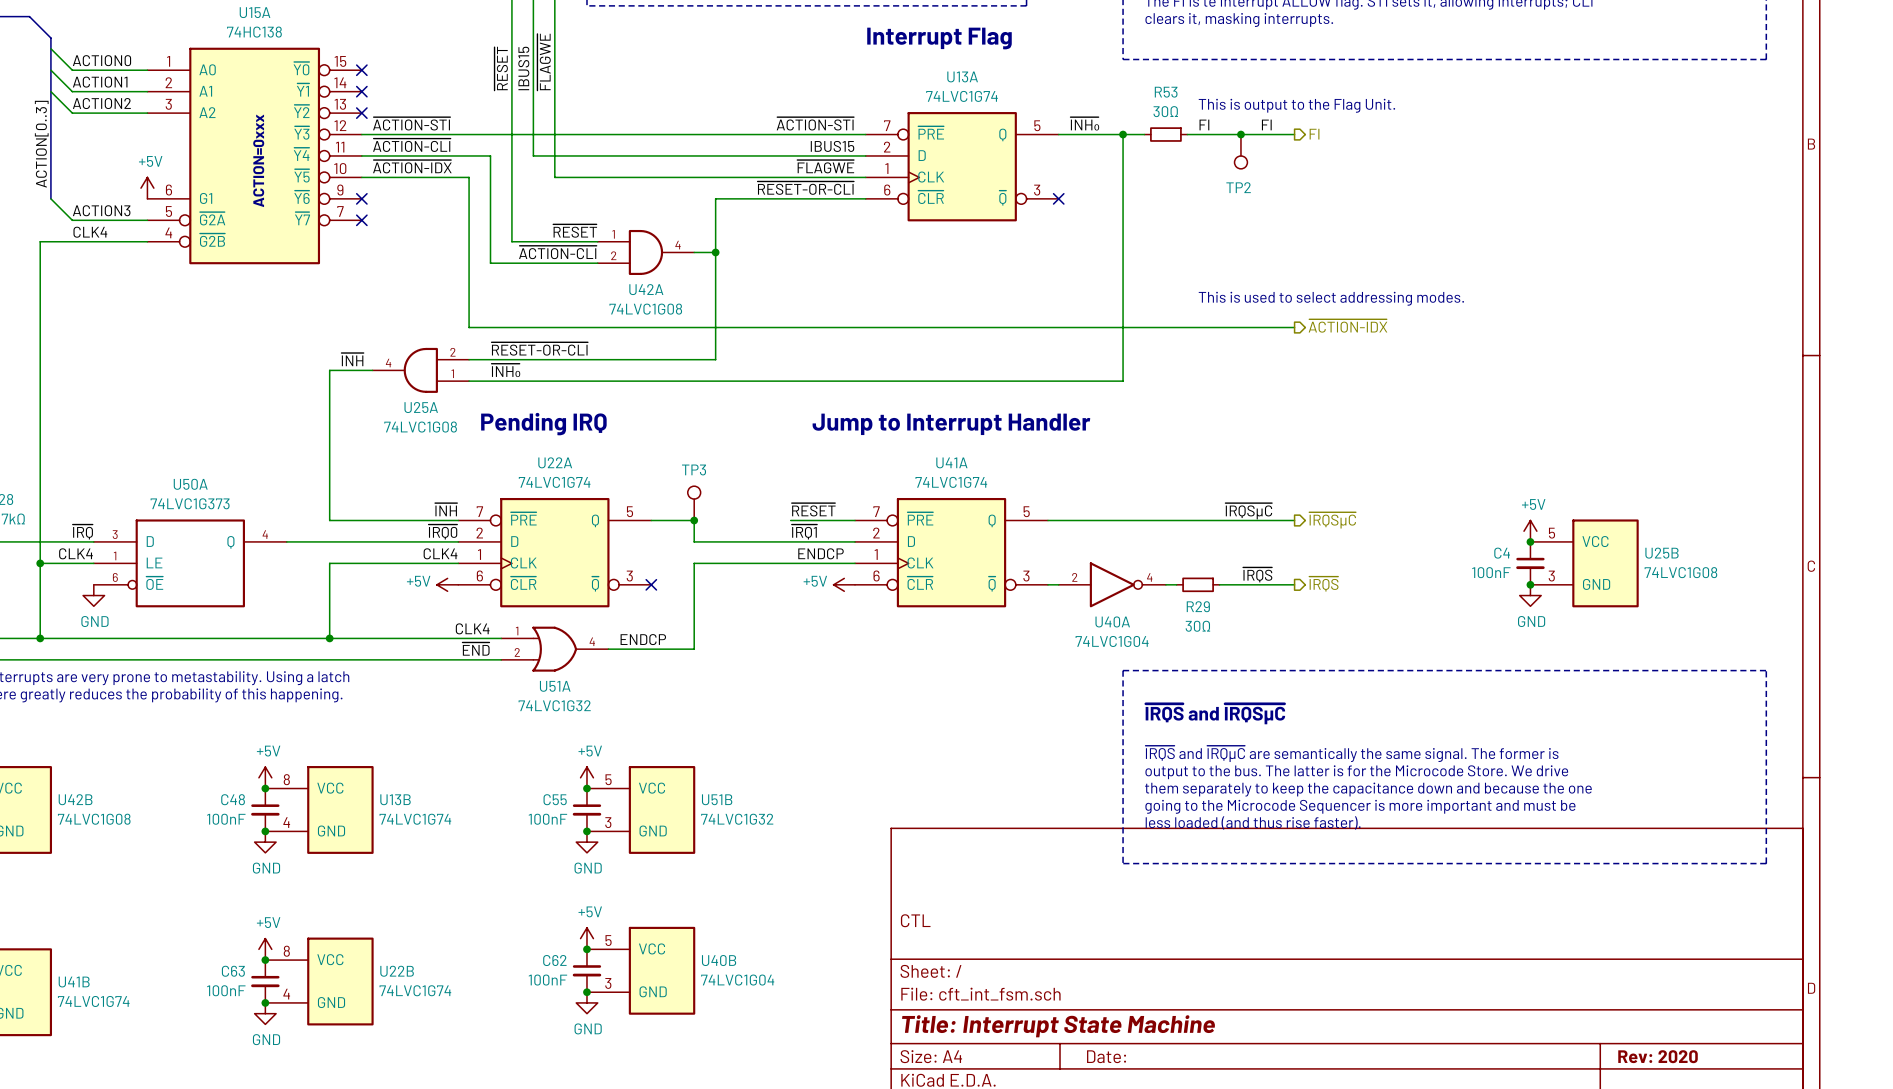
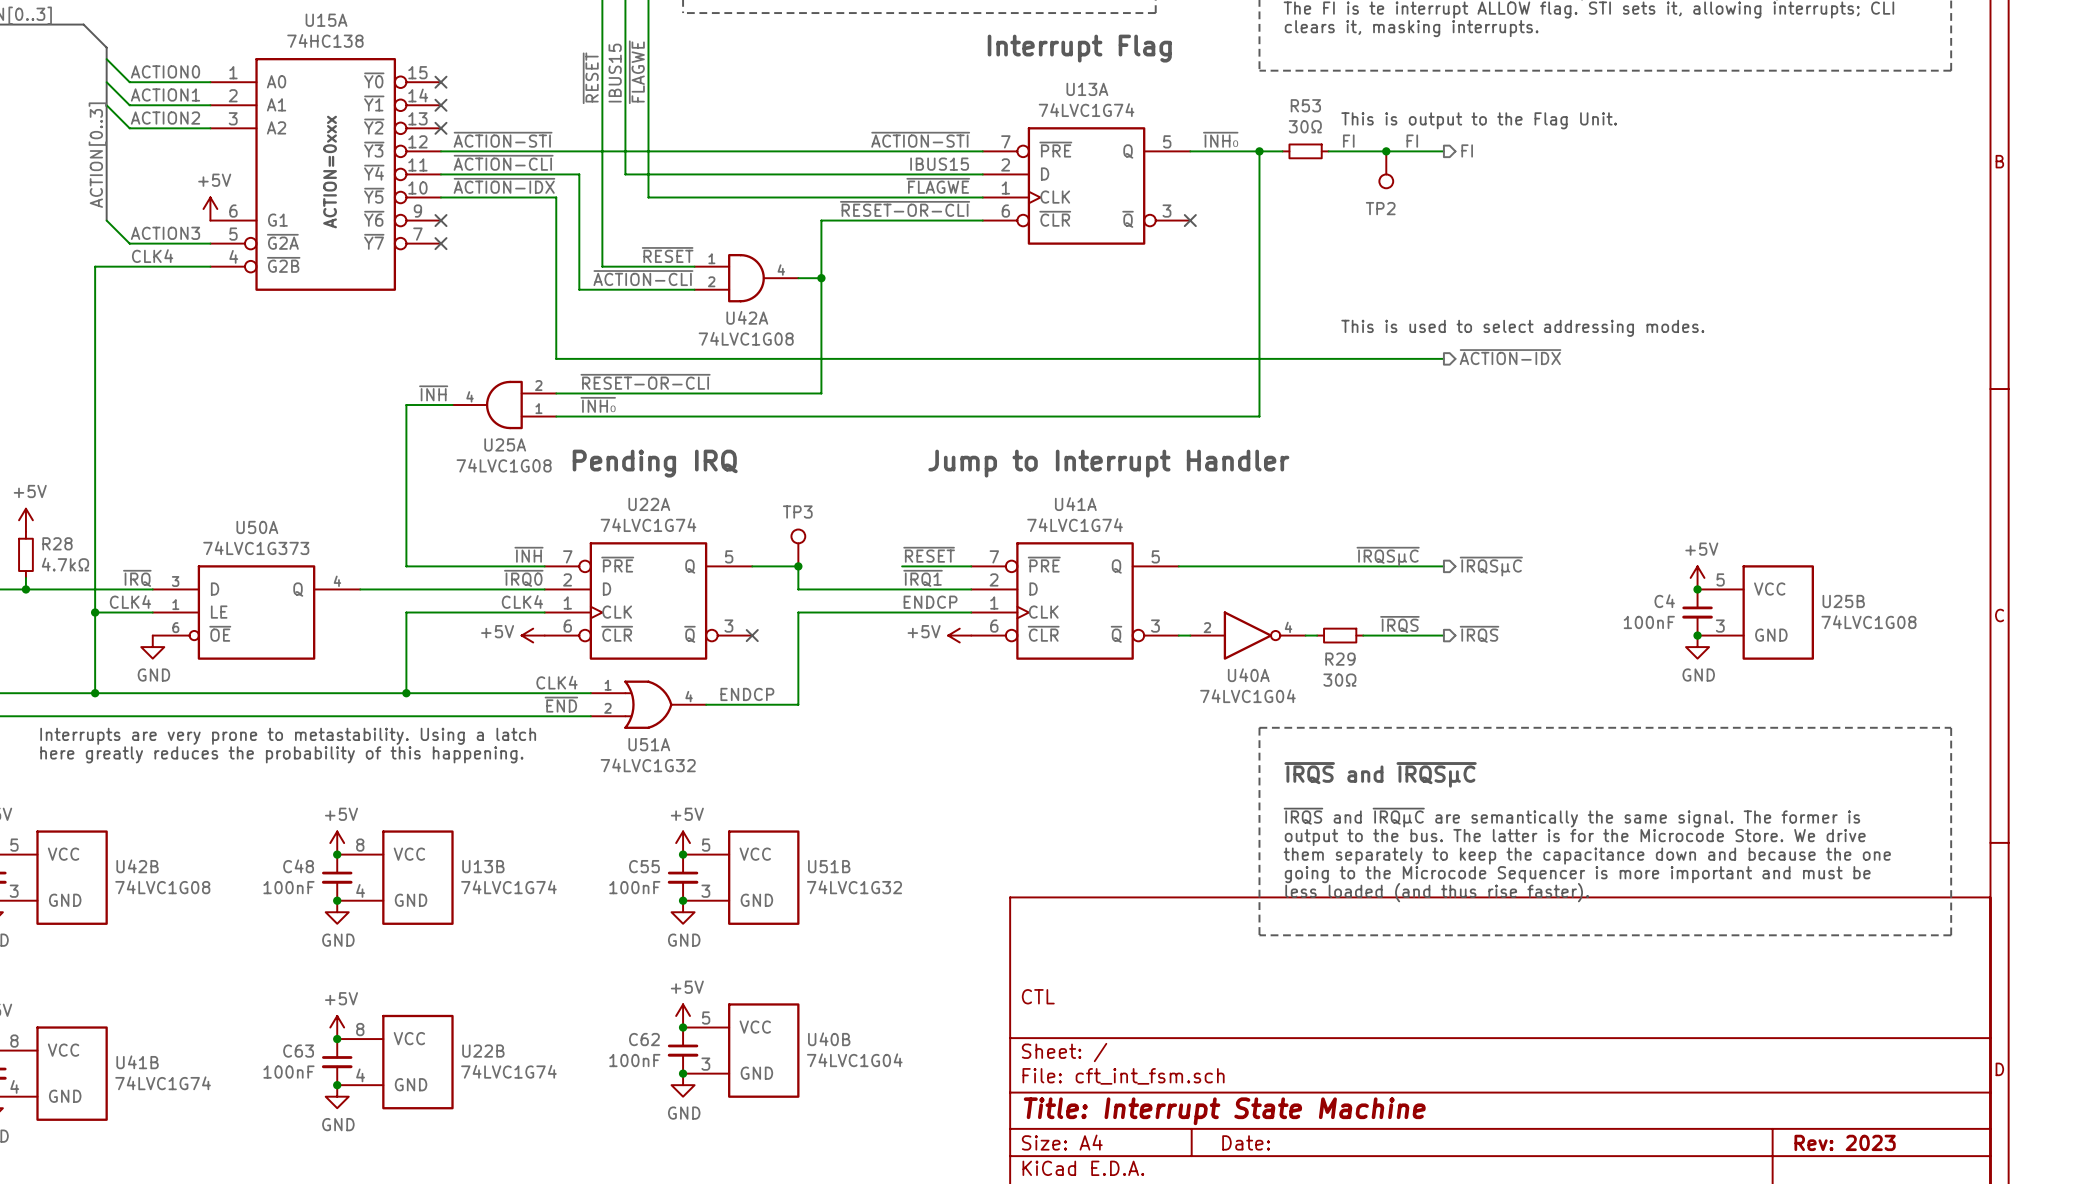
title block: Rev: 2020 (1658, 1056) -> Rev: 2023 (1845, 1142)

